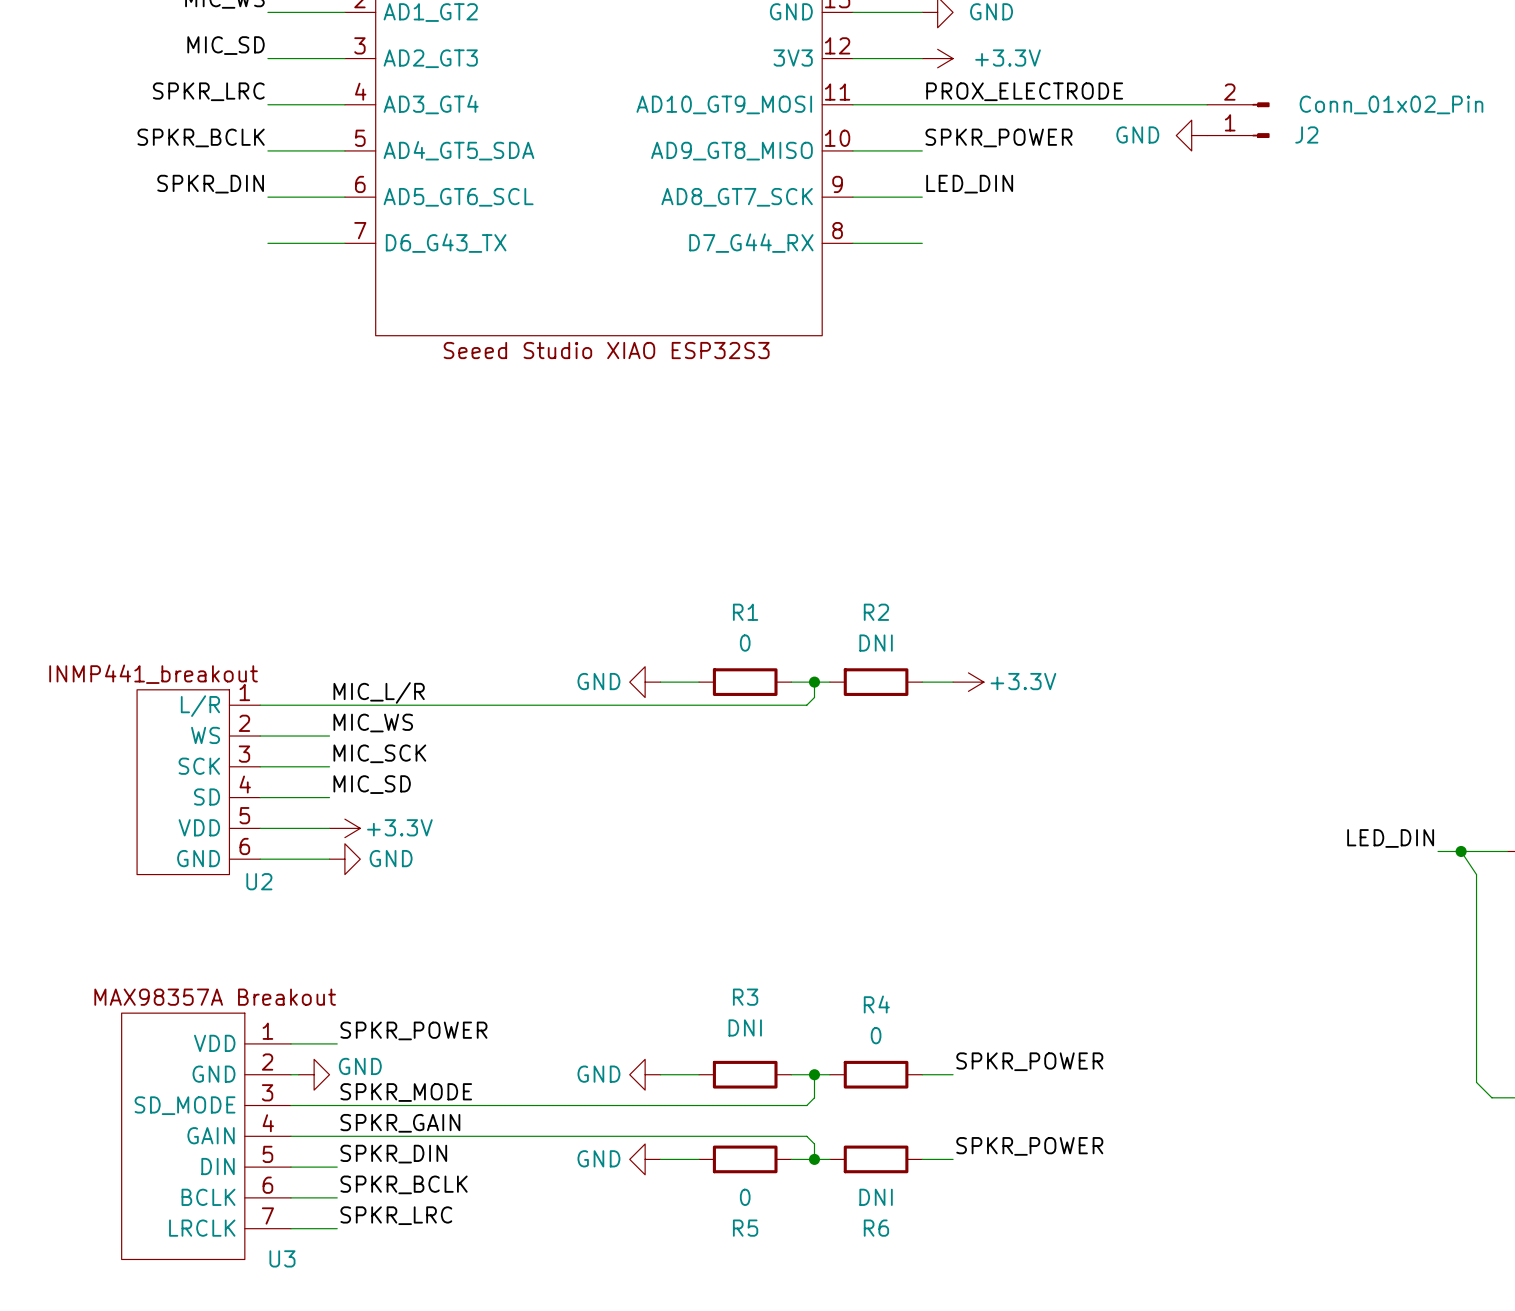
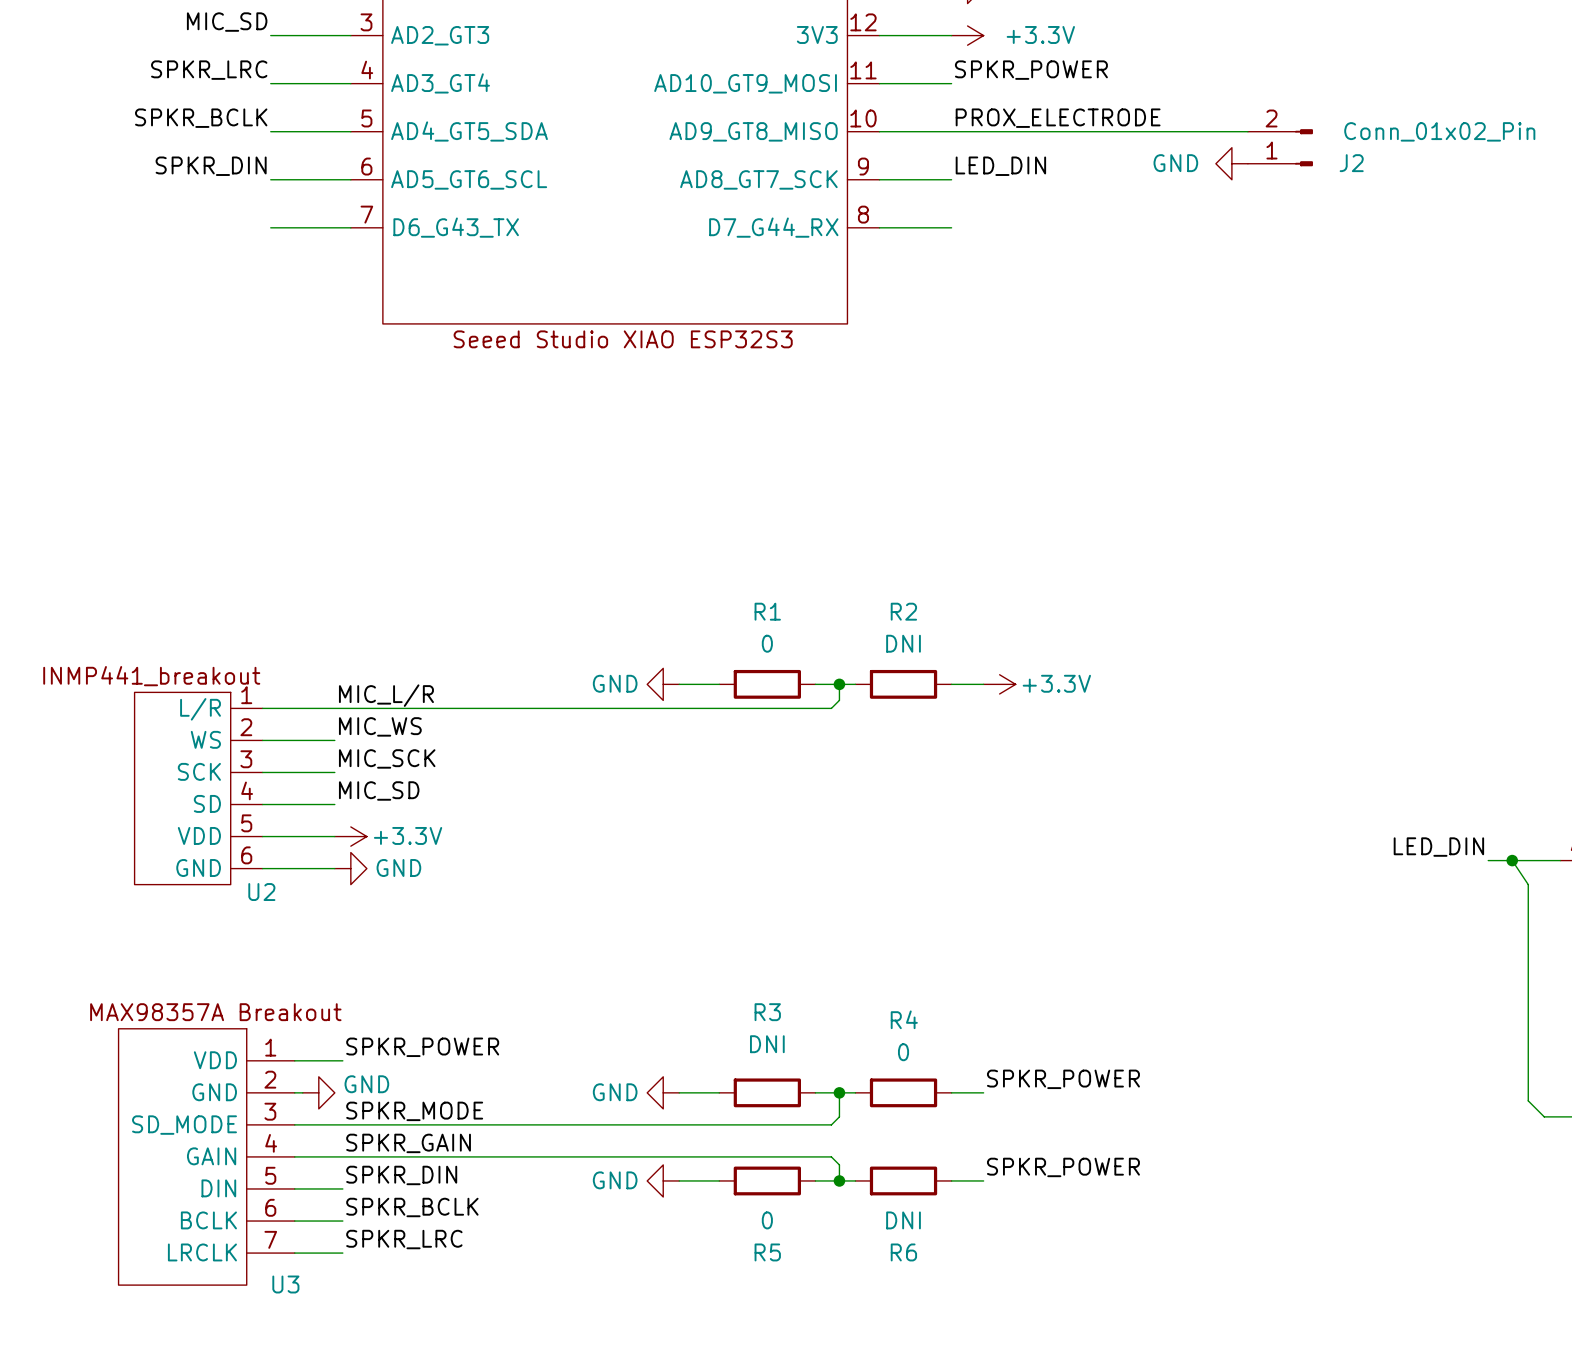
label: PROX_ELECTRODE (1024, 91) -> SPKR_POWER (1031, 70)
wire: (922, 104) (1207, 104) -> (951, 131) (1247, 131)
J2 position: (1238, 120) -> (1280, 147)
power symbol position: GND (1191, 135) -> GND (1231, 163)
label: SPKR_POWER (998, 137) -> PROX_ELECTRODE (1058, 118)

